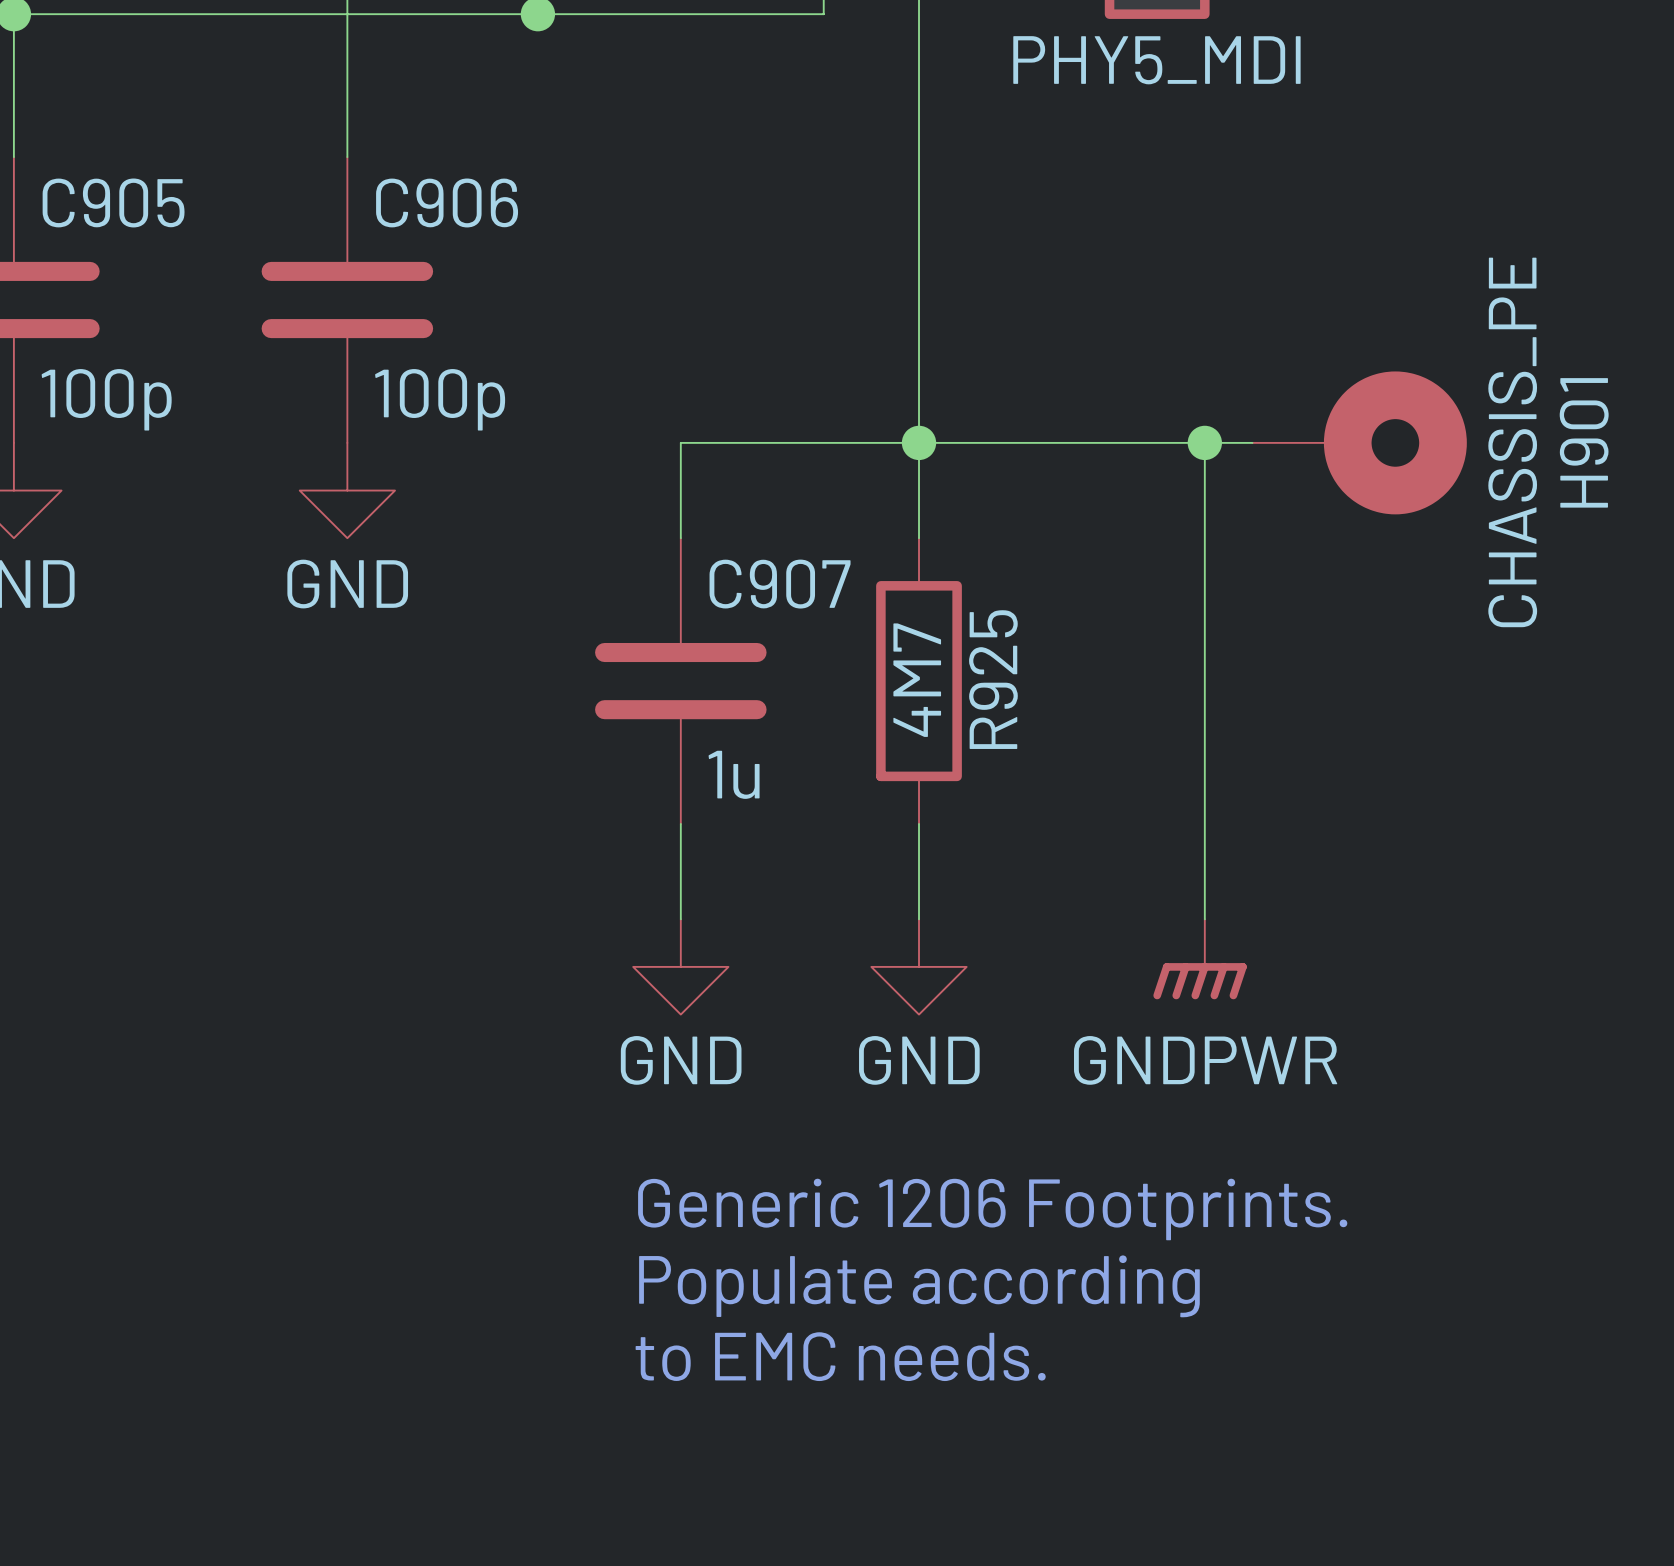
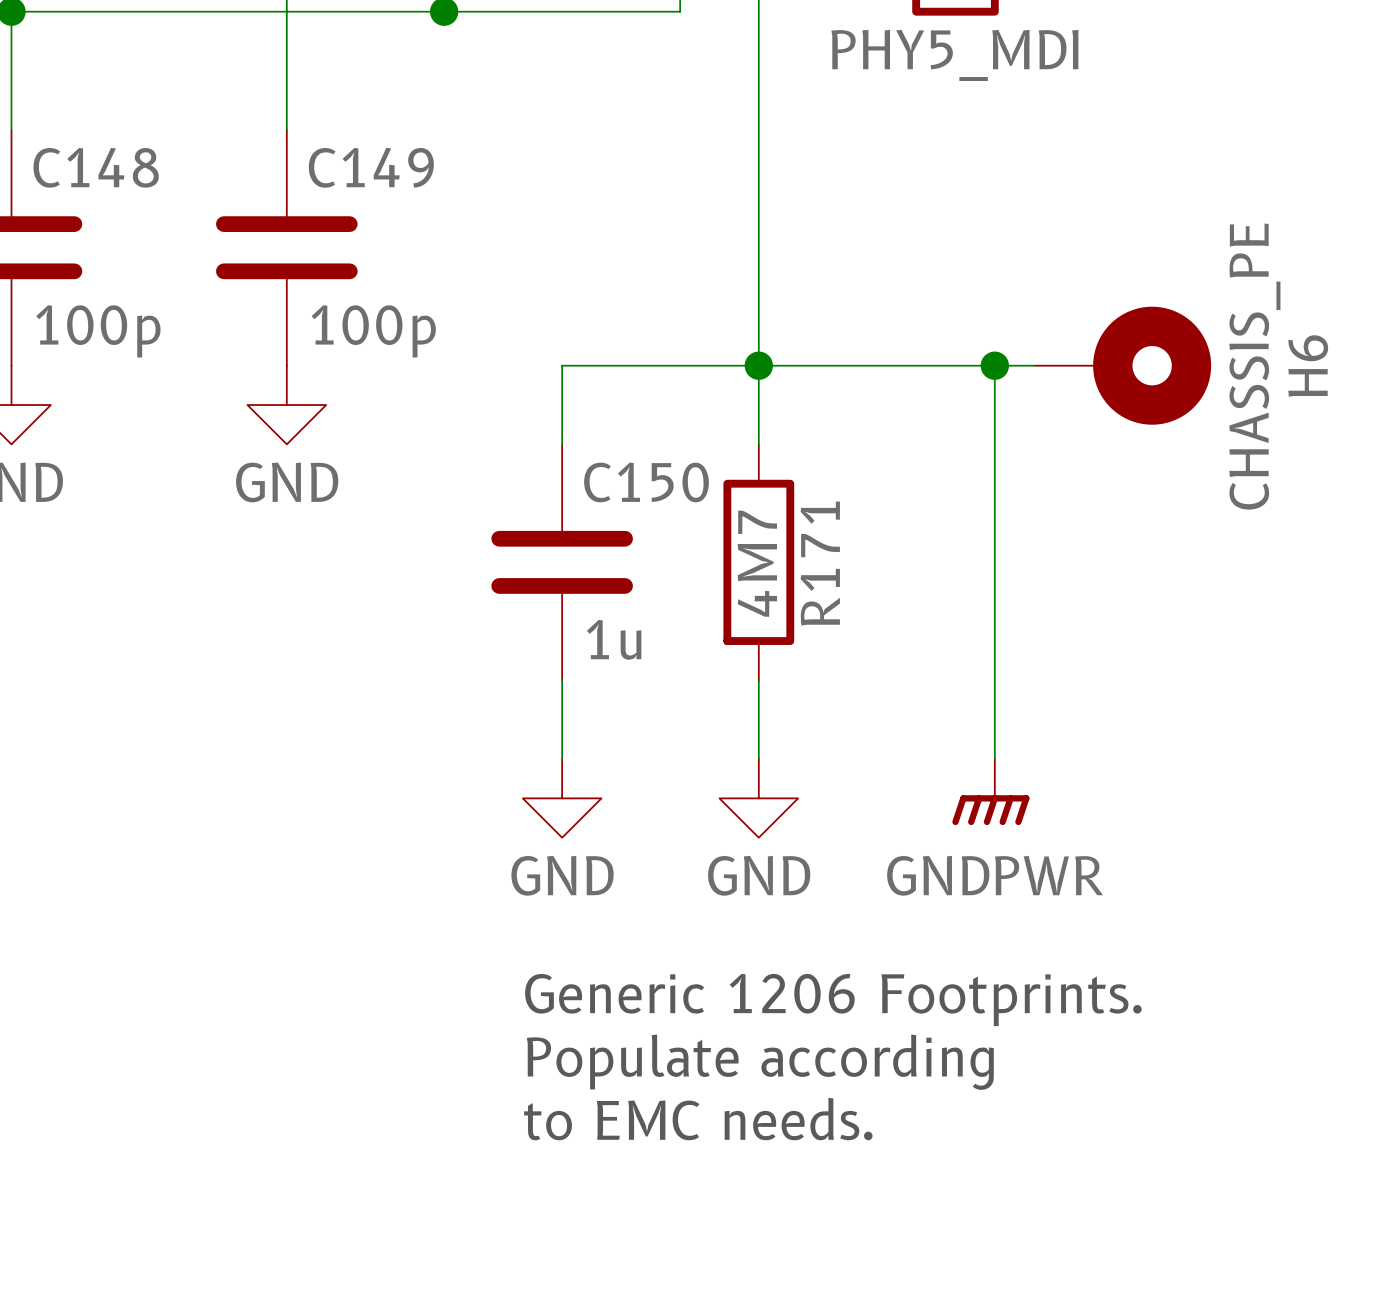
C905 name: C905 (113, 202) -> C148 (96, 167)
C906 name: C906 (447, 202) -> C149 (371, 167)
H901 name: H901 (1584, 442) -> H6 (1308, 365)
C907 name: C907 (780, 584) -> C150 (646, 482)
R925 name: R925 (993, 679) -> R171 (820, 563)

